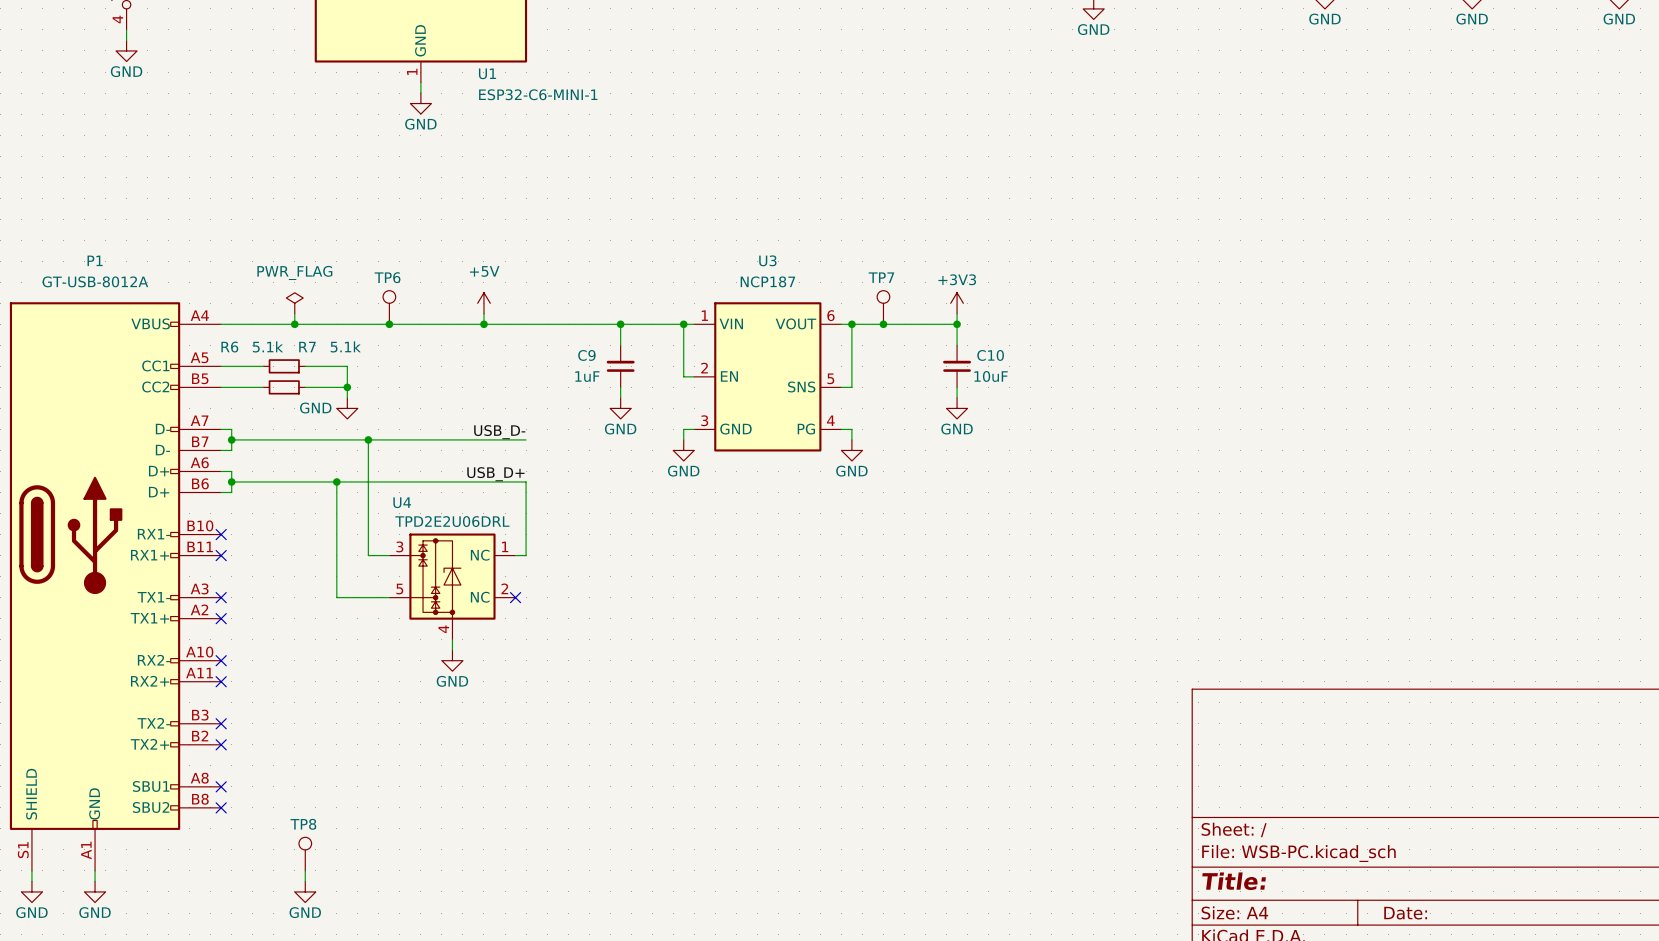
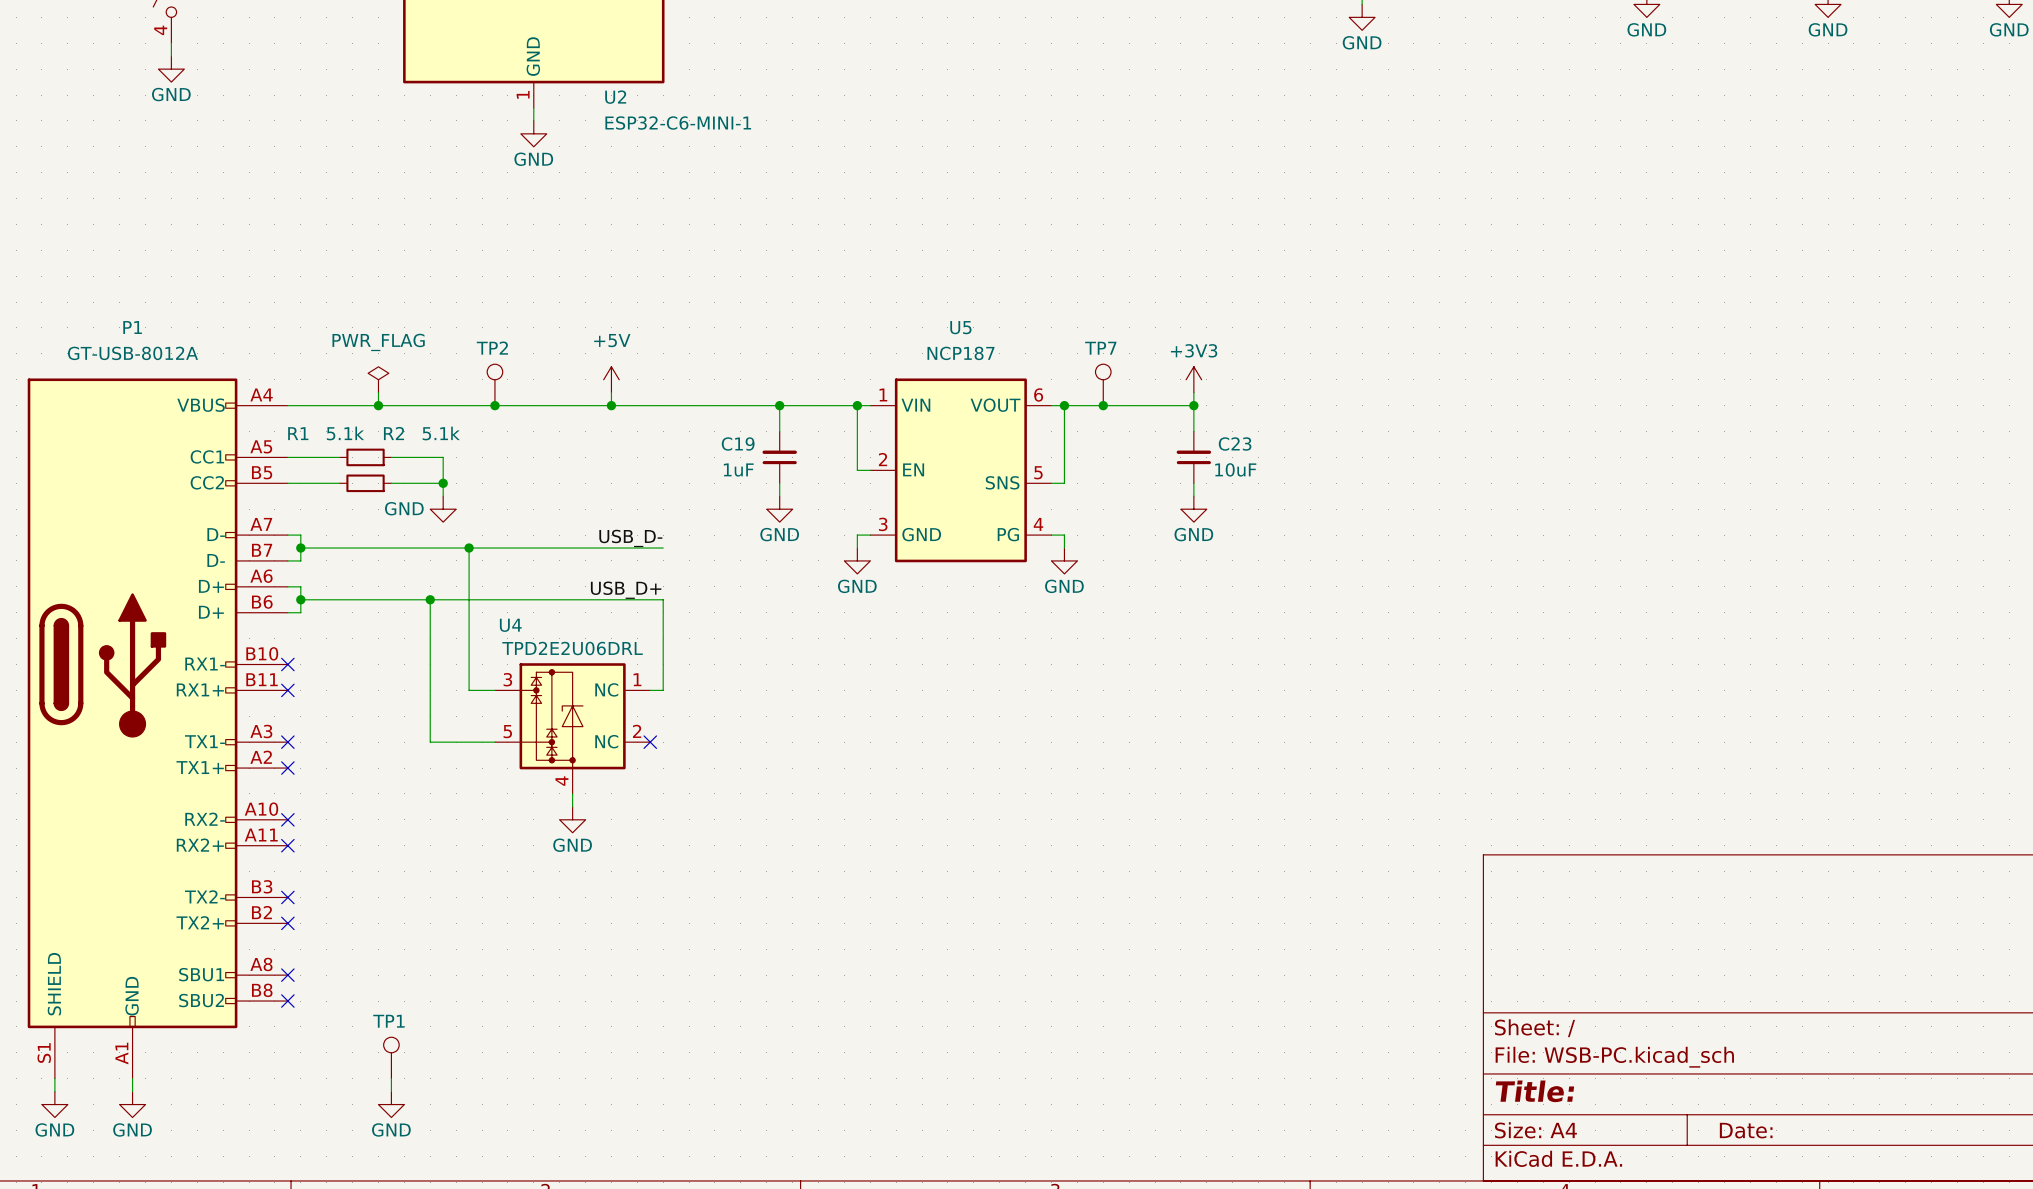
U1 name: U1 (487, 73) -> U2 (615, 97)
U3 name: U3 (767, 260) -> U5 (960, 327)
TP6 name: TP6 (387, 277) -> TP2 (492, 348)
R6 name: R6 (229, 347) -> R1 (298, 433)
R7 name: R7 (307, 347) -> R2 (393, 433)
C9 name: C9 (586, 355) -> C19 (738, 444)
C10 name: C10 (990, 355) -> C23 (1235, 444)
TP8 name: TP8 (303, 824) -> TP1 (388, 1021)

